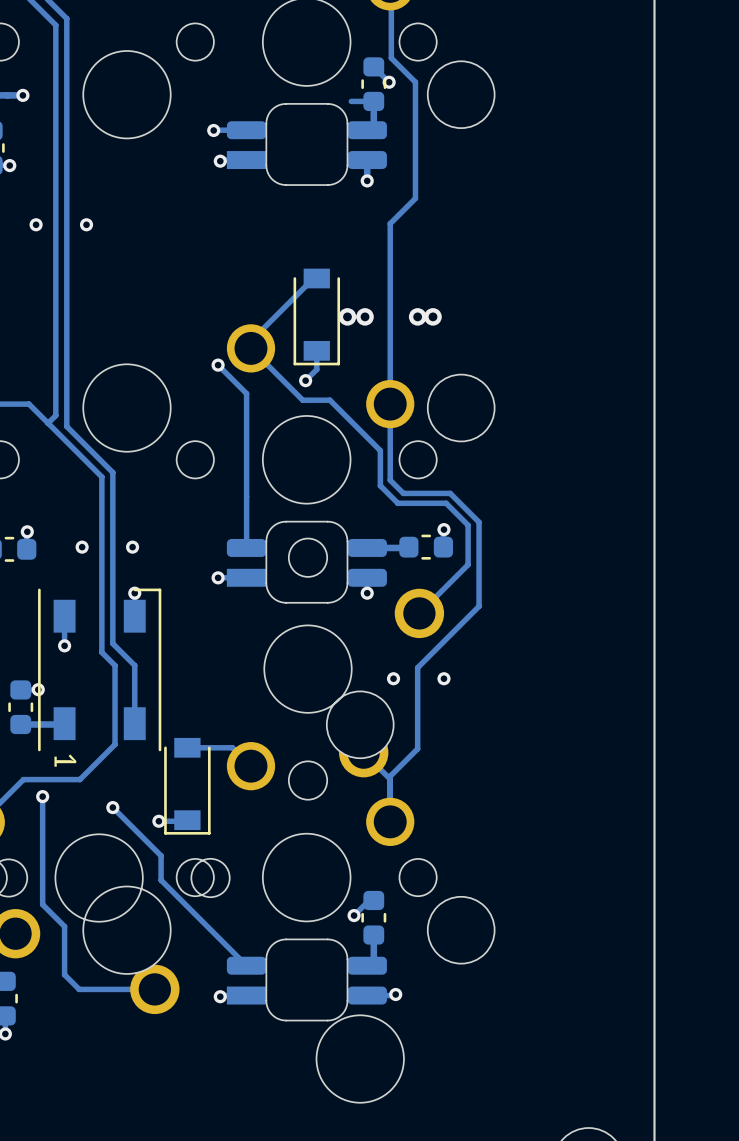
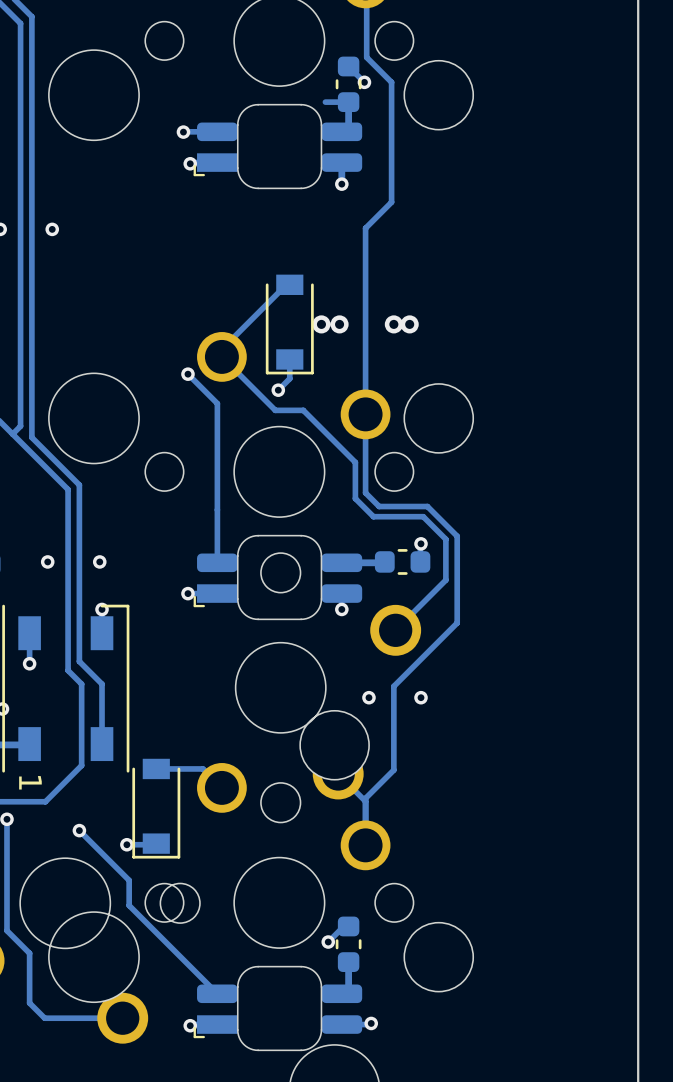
drawing: none -> [193, 164, 205, 177]
drawing: none -> [193, 595, 205, 608]
drawing: none -> [193, 1026, 205, 1039]

